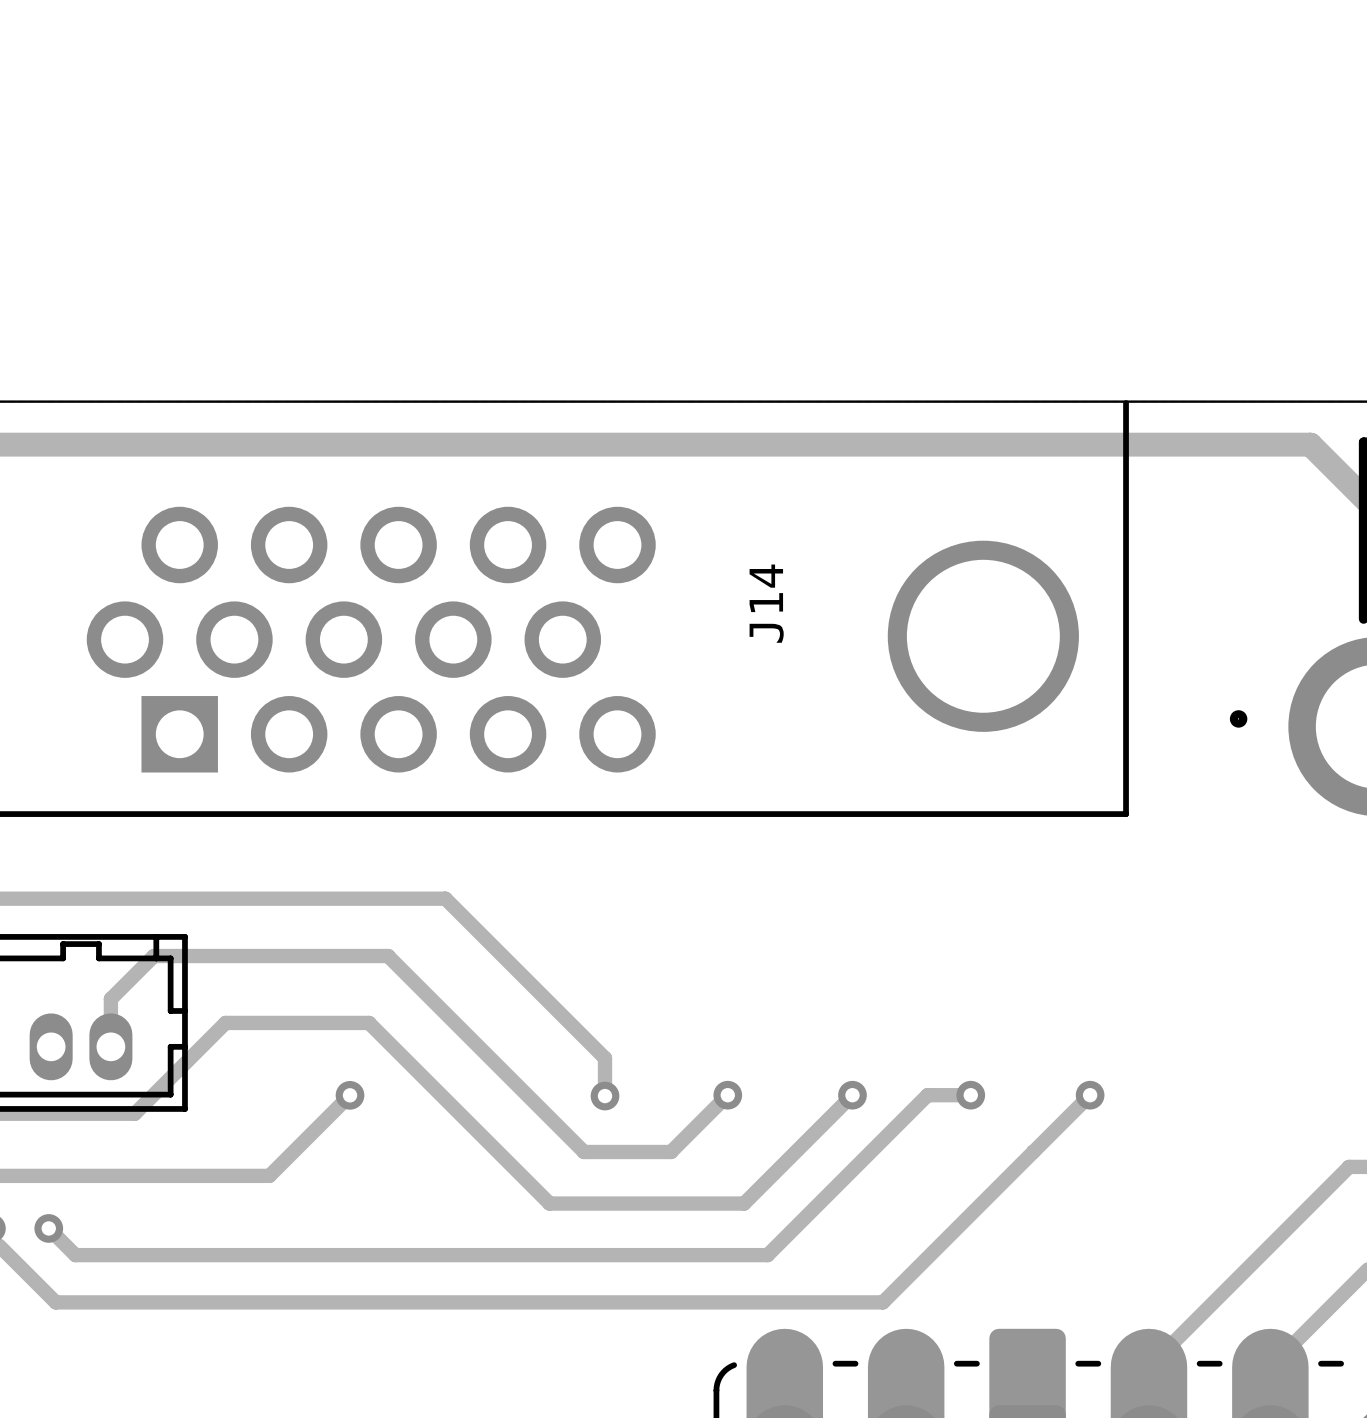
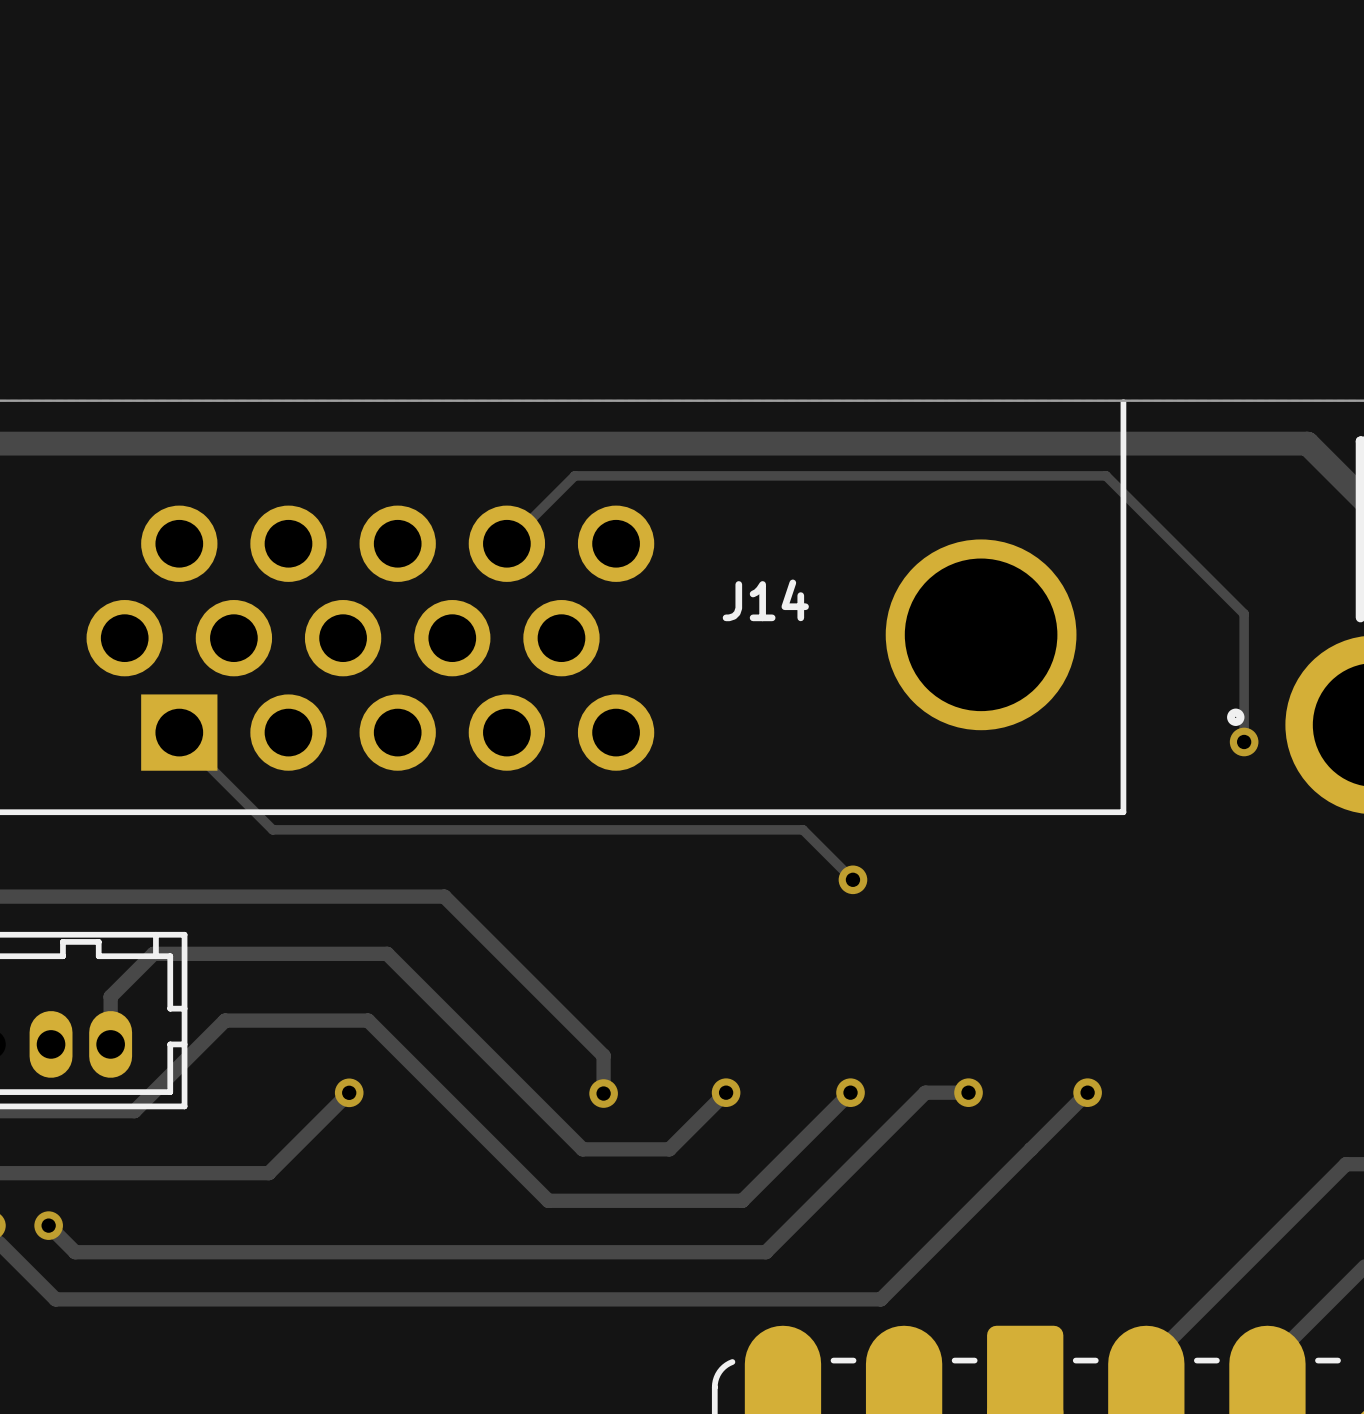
track: none -> (506, 543) (574, 475) (1106, 475) (1244, 613) (1244, 741)
J14 name rotation: 0° (766, 603) -> 90° clockwise (765, 600)
track: none -> (179, 736) (272, 829) (803, 829) (852, 879)
via: none -> (1244, 741)
via: none -> (852, 879)

